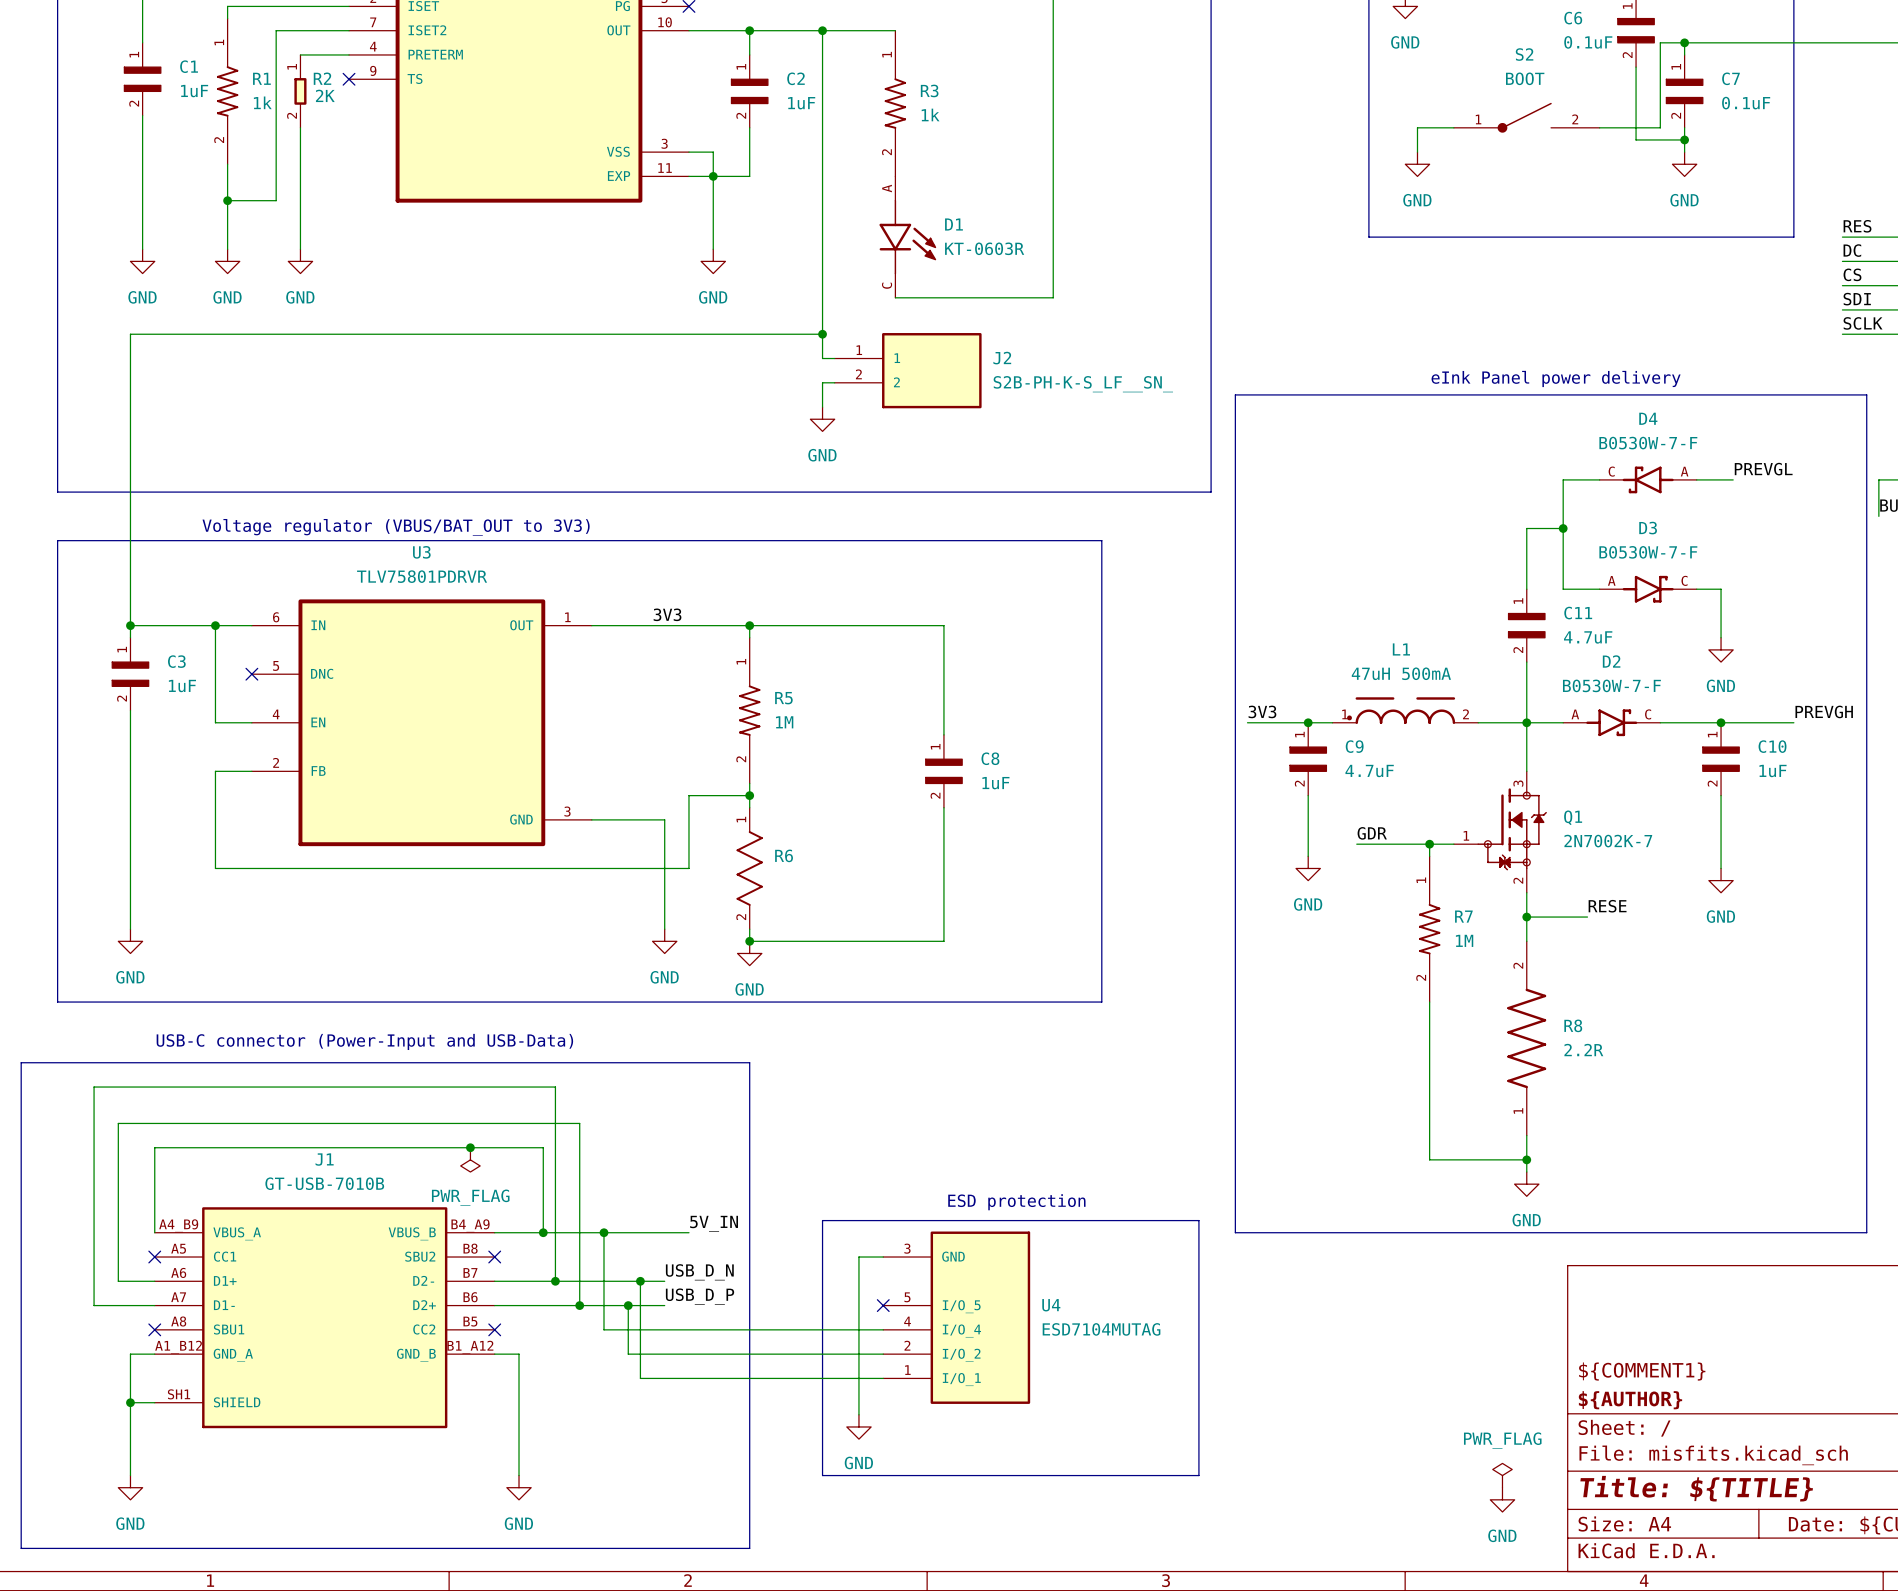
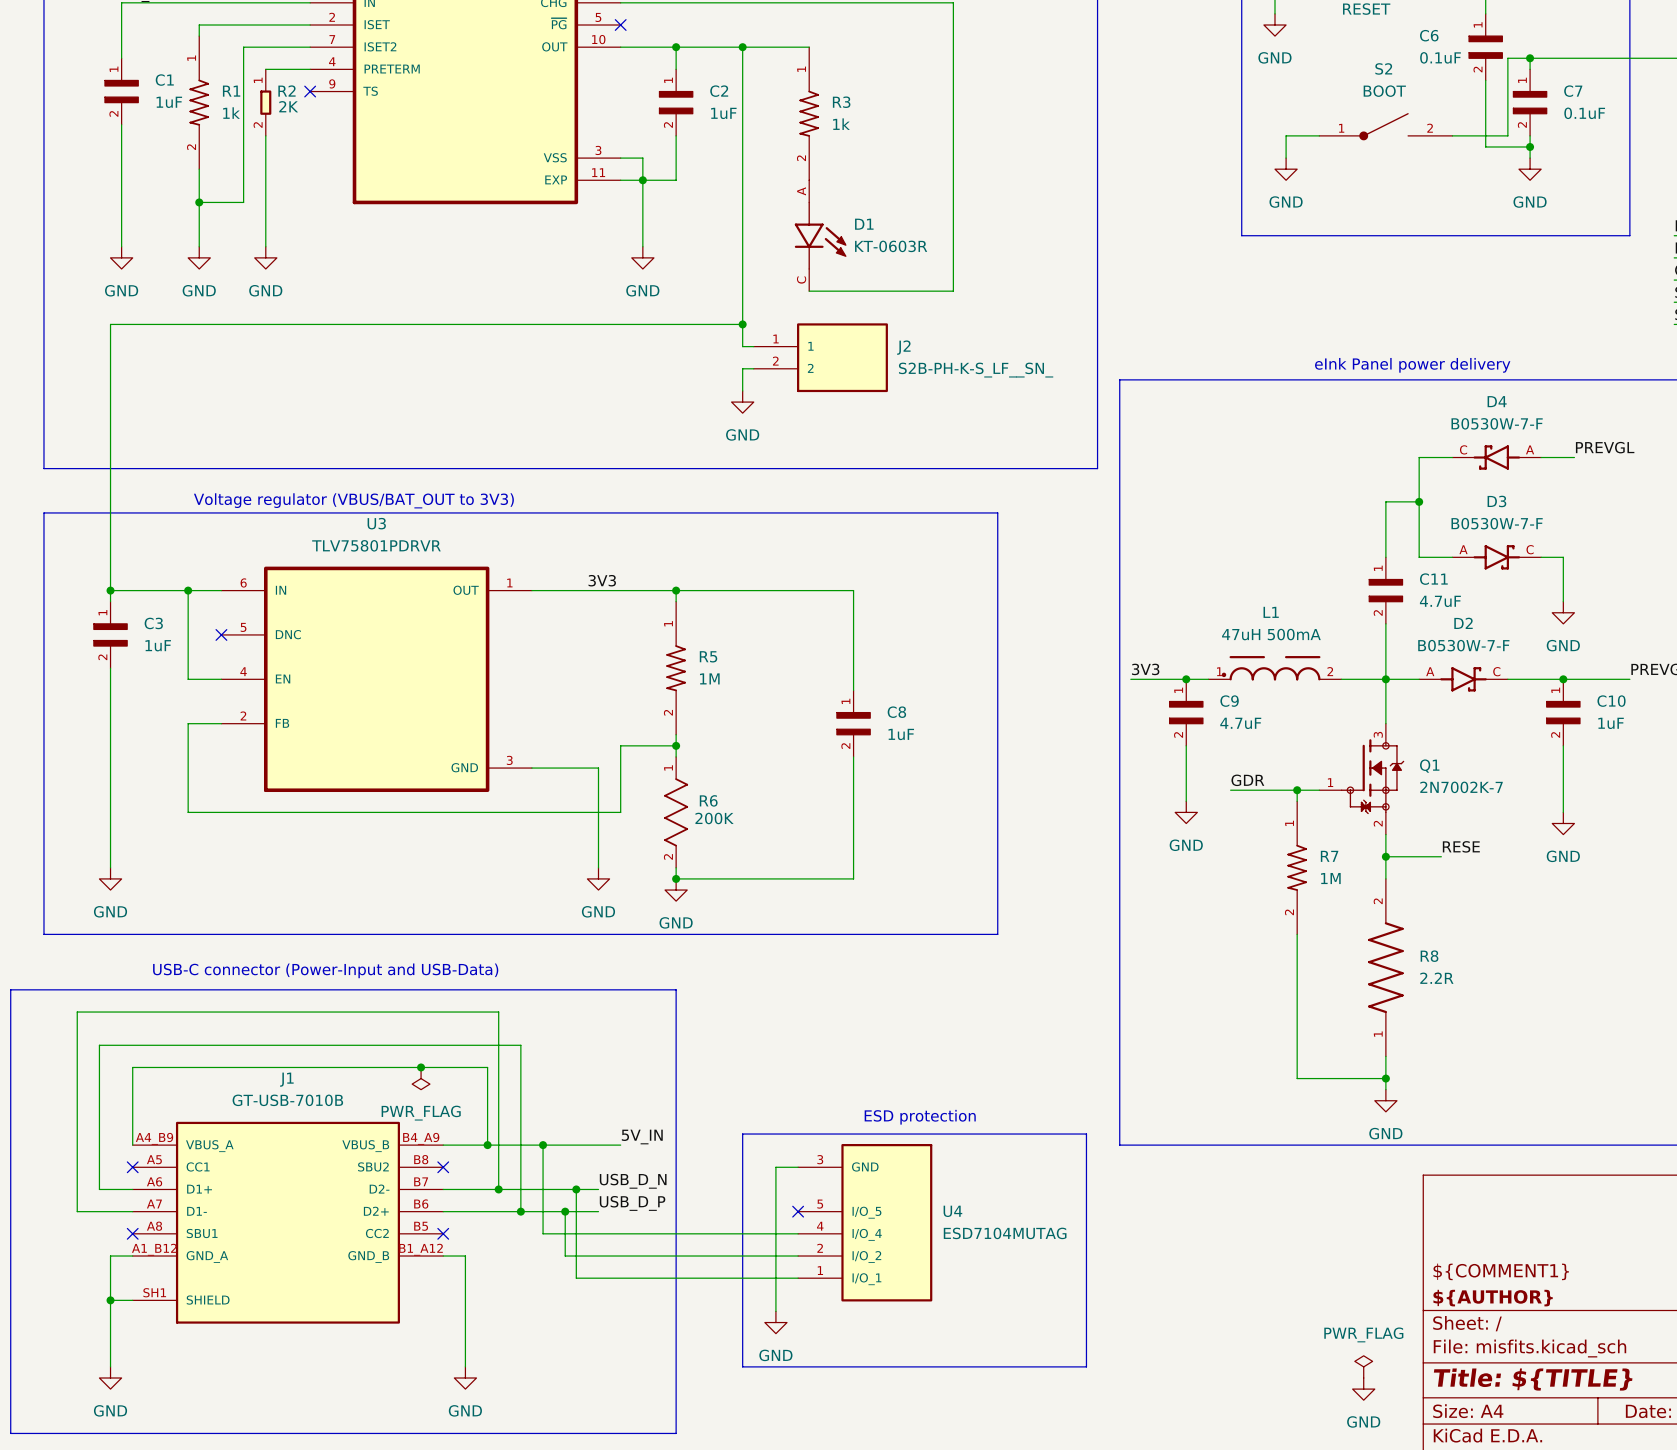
R6 value: none -> 200K (714, 818)

